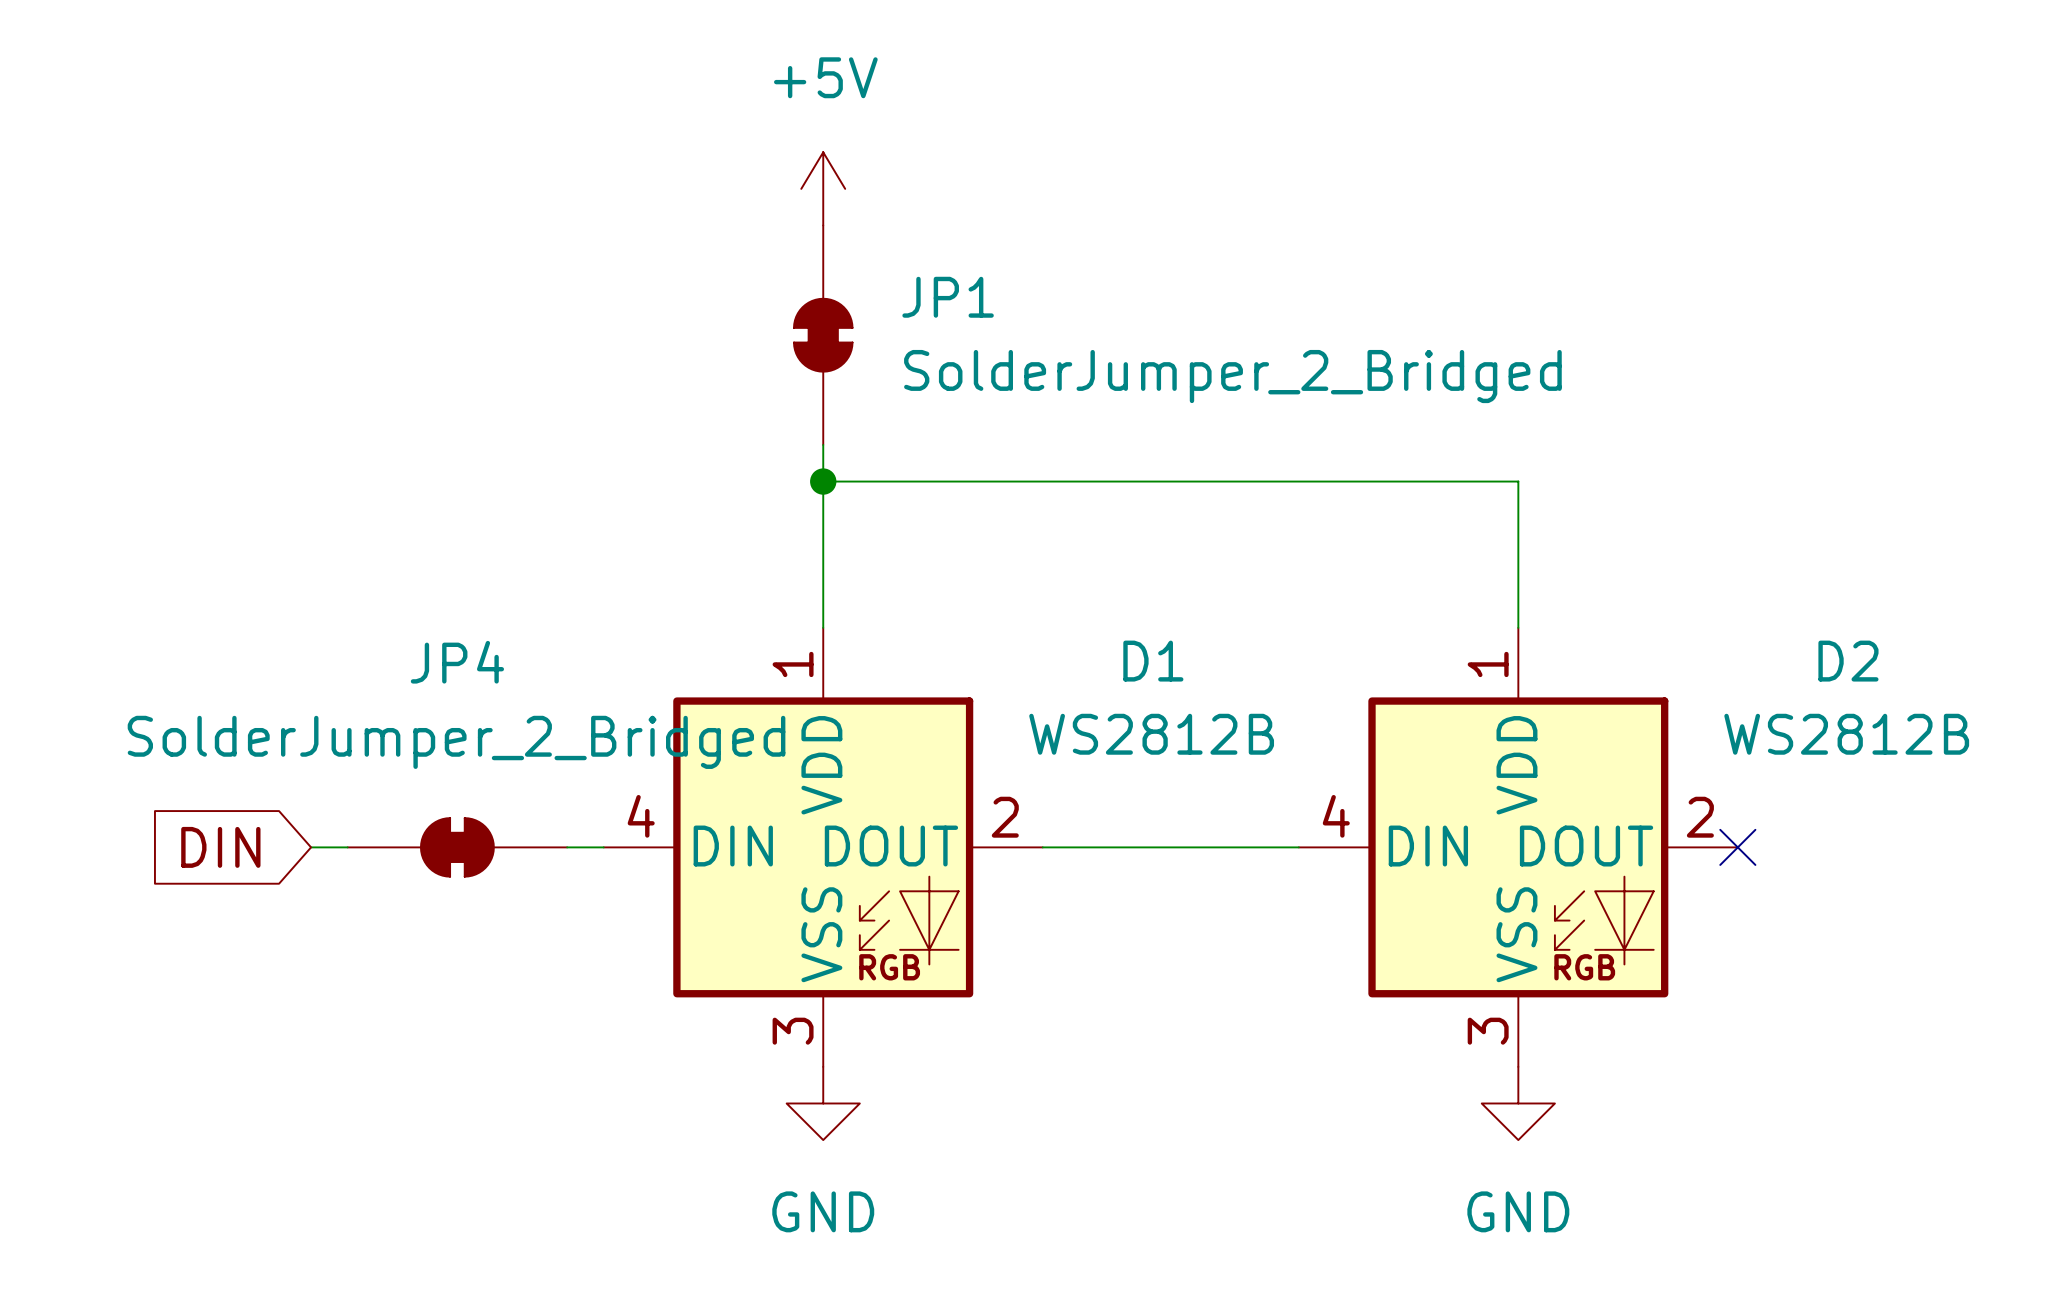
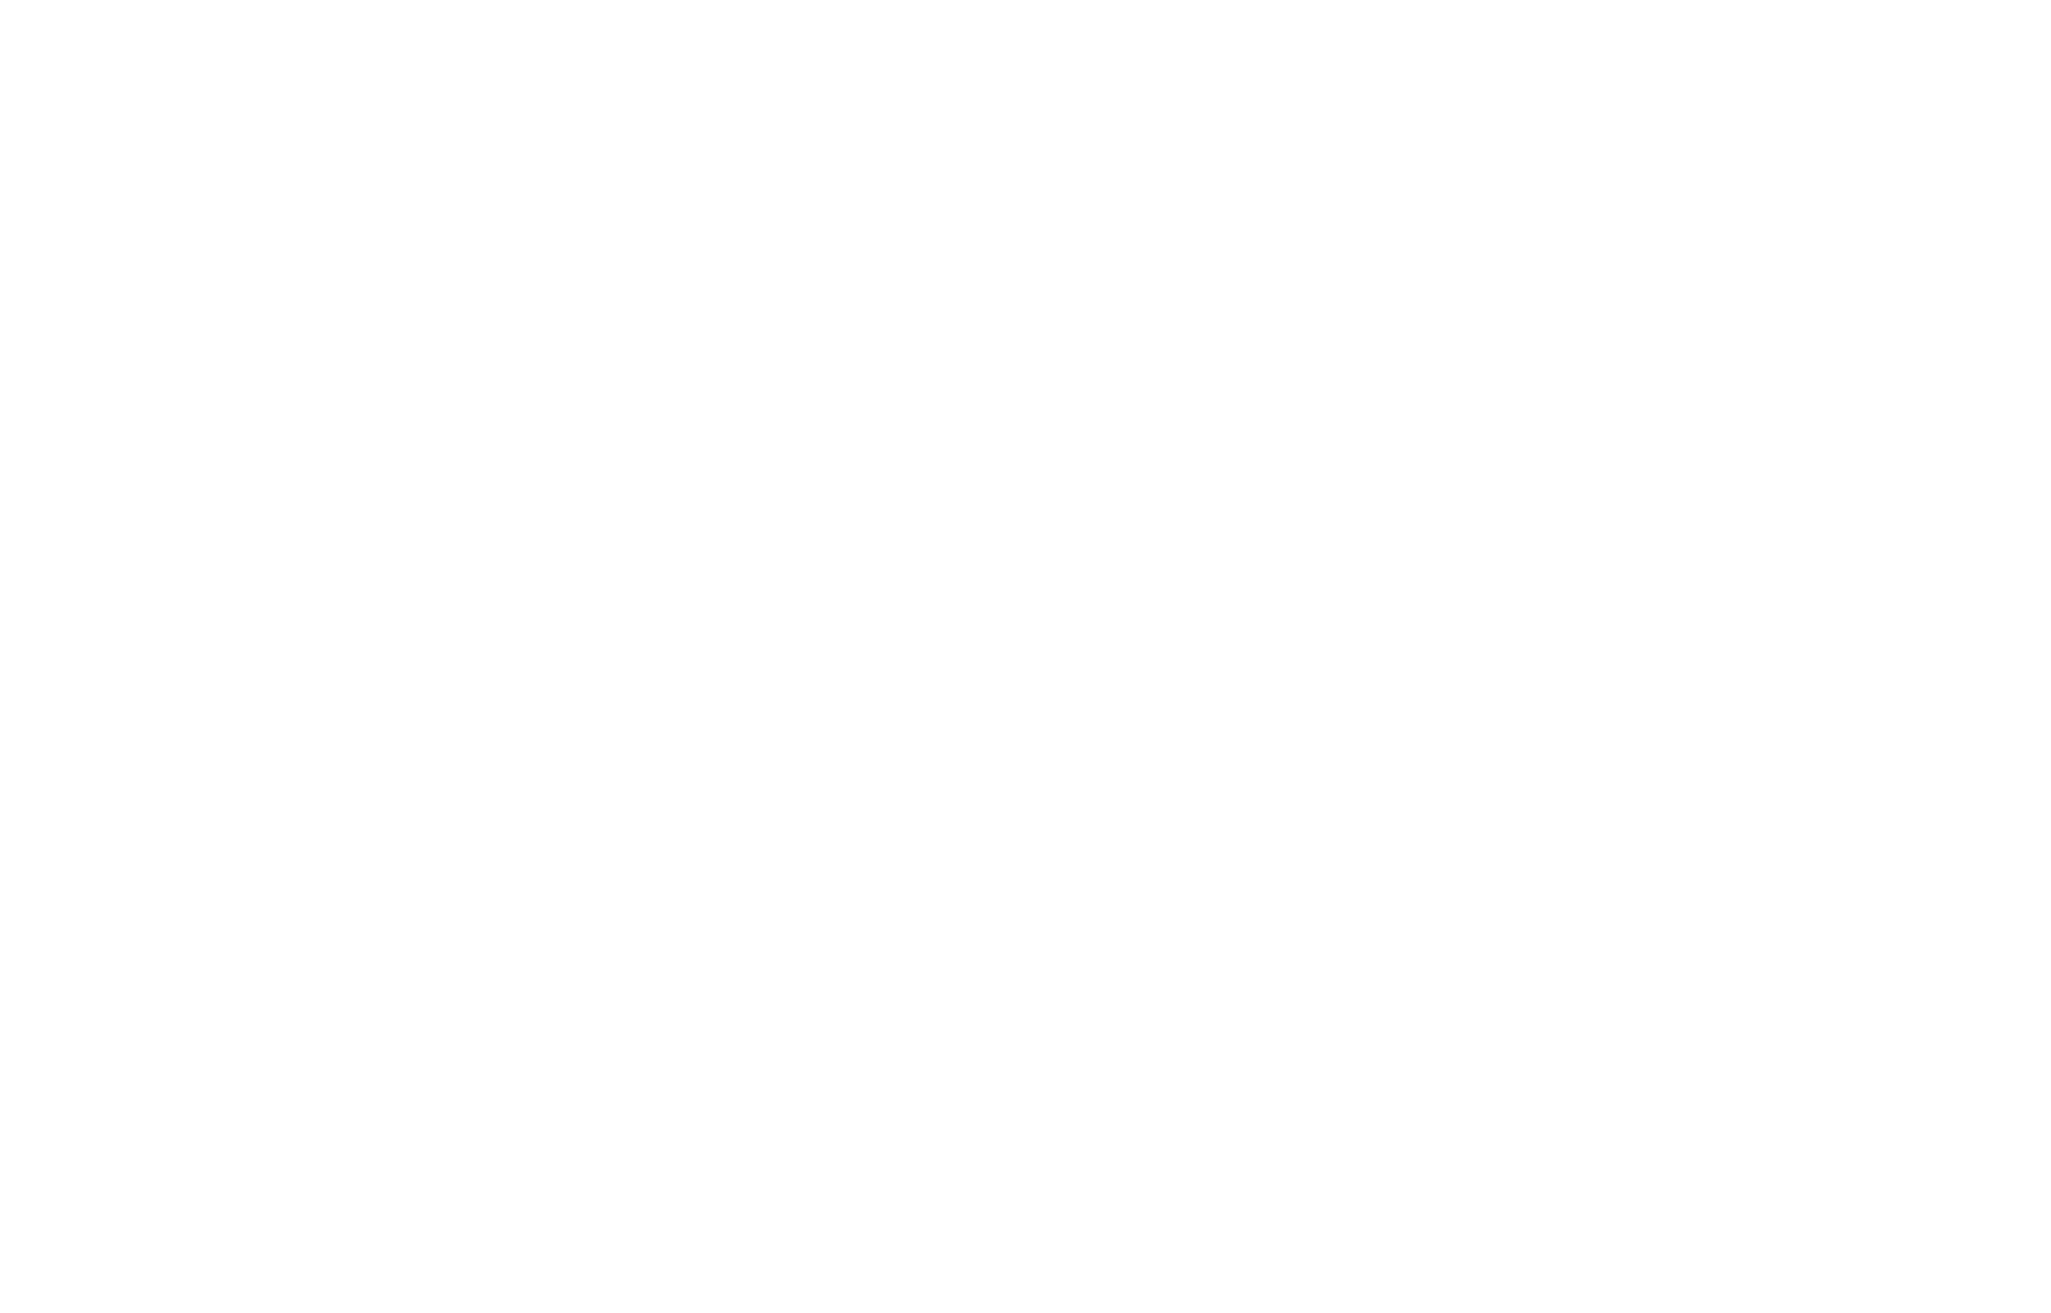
power symbol: +5V (823, 188) -> none
JP1: SolderJumper_2_Bridged (823, 335) -> none
wire: (823, 444) (823, 627) -> none
wire: (823, 481) (1518, 481) (1518, 627) -> none
junction: (823, 481) -> none
global label: DIN (220, 847) -> none
wire: (311, 847) (347, 847) -> none
JP4: SolderJumper_2_Bridged (457, 847) -> none
wire: (567, 847) (603, 847) -> none
D1: WS2812B (823, 847) -> none
wire: (1042, 847) (1298, 847) -> none
D2: WS2812B (1518, 847) -> none
no-connect mark: (1737, 847) -> none
power symbol: GND (823, 1103) -> none
power symbol: GND (1518, 1103) -> none

